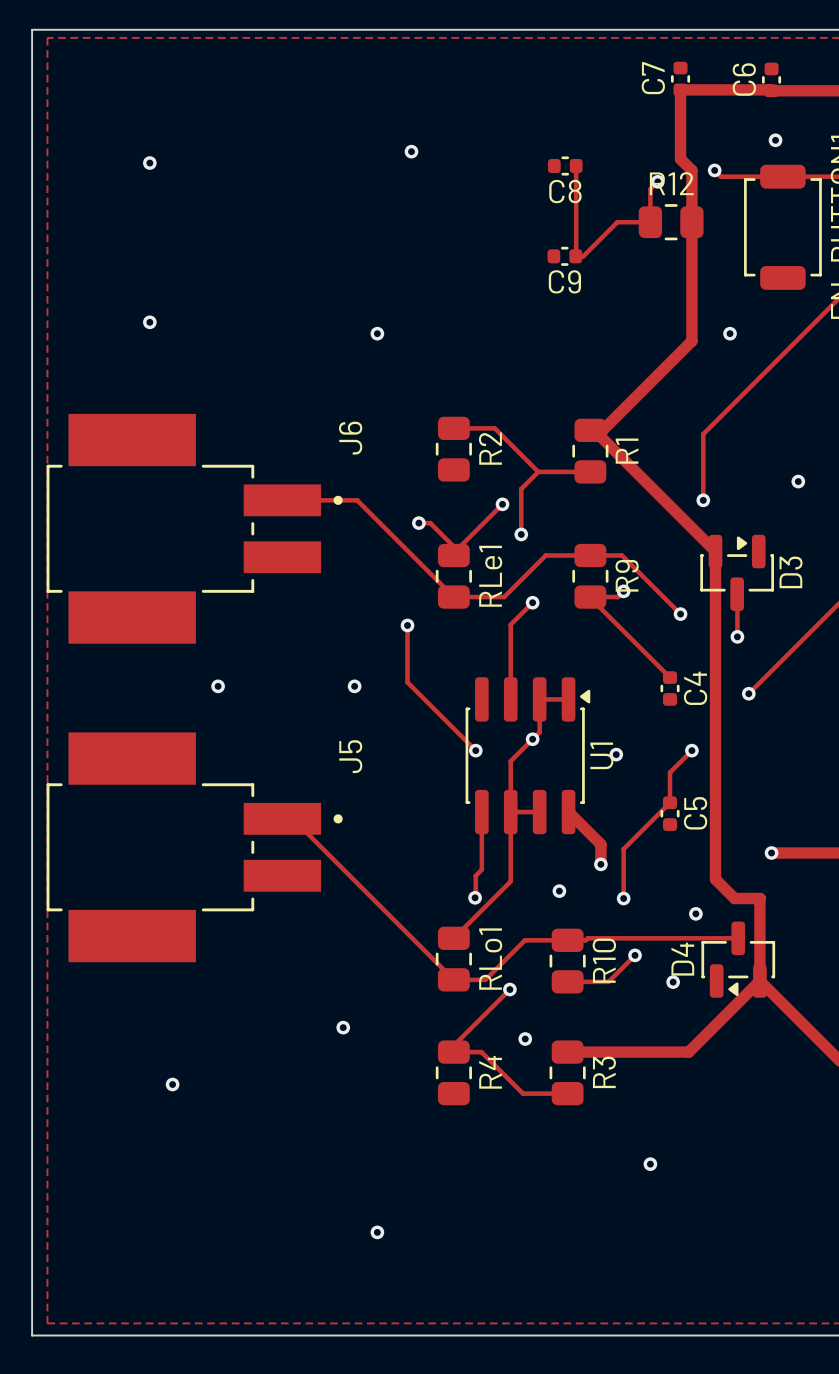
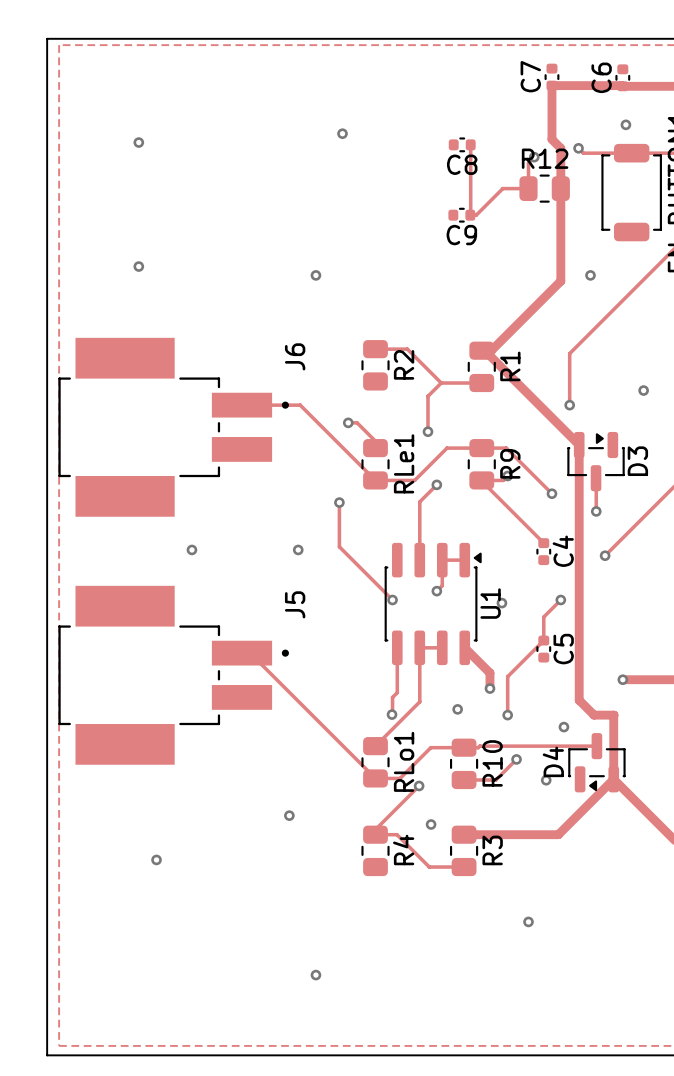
track: (502, 504) (453, 552) -> none
via: (502, 504) -> none
track: (532, 739) (510, 761) (510, 812) -> none

